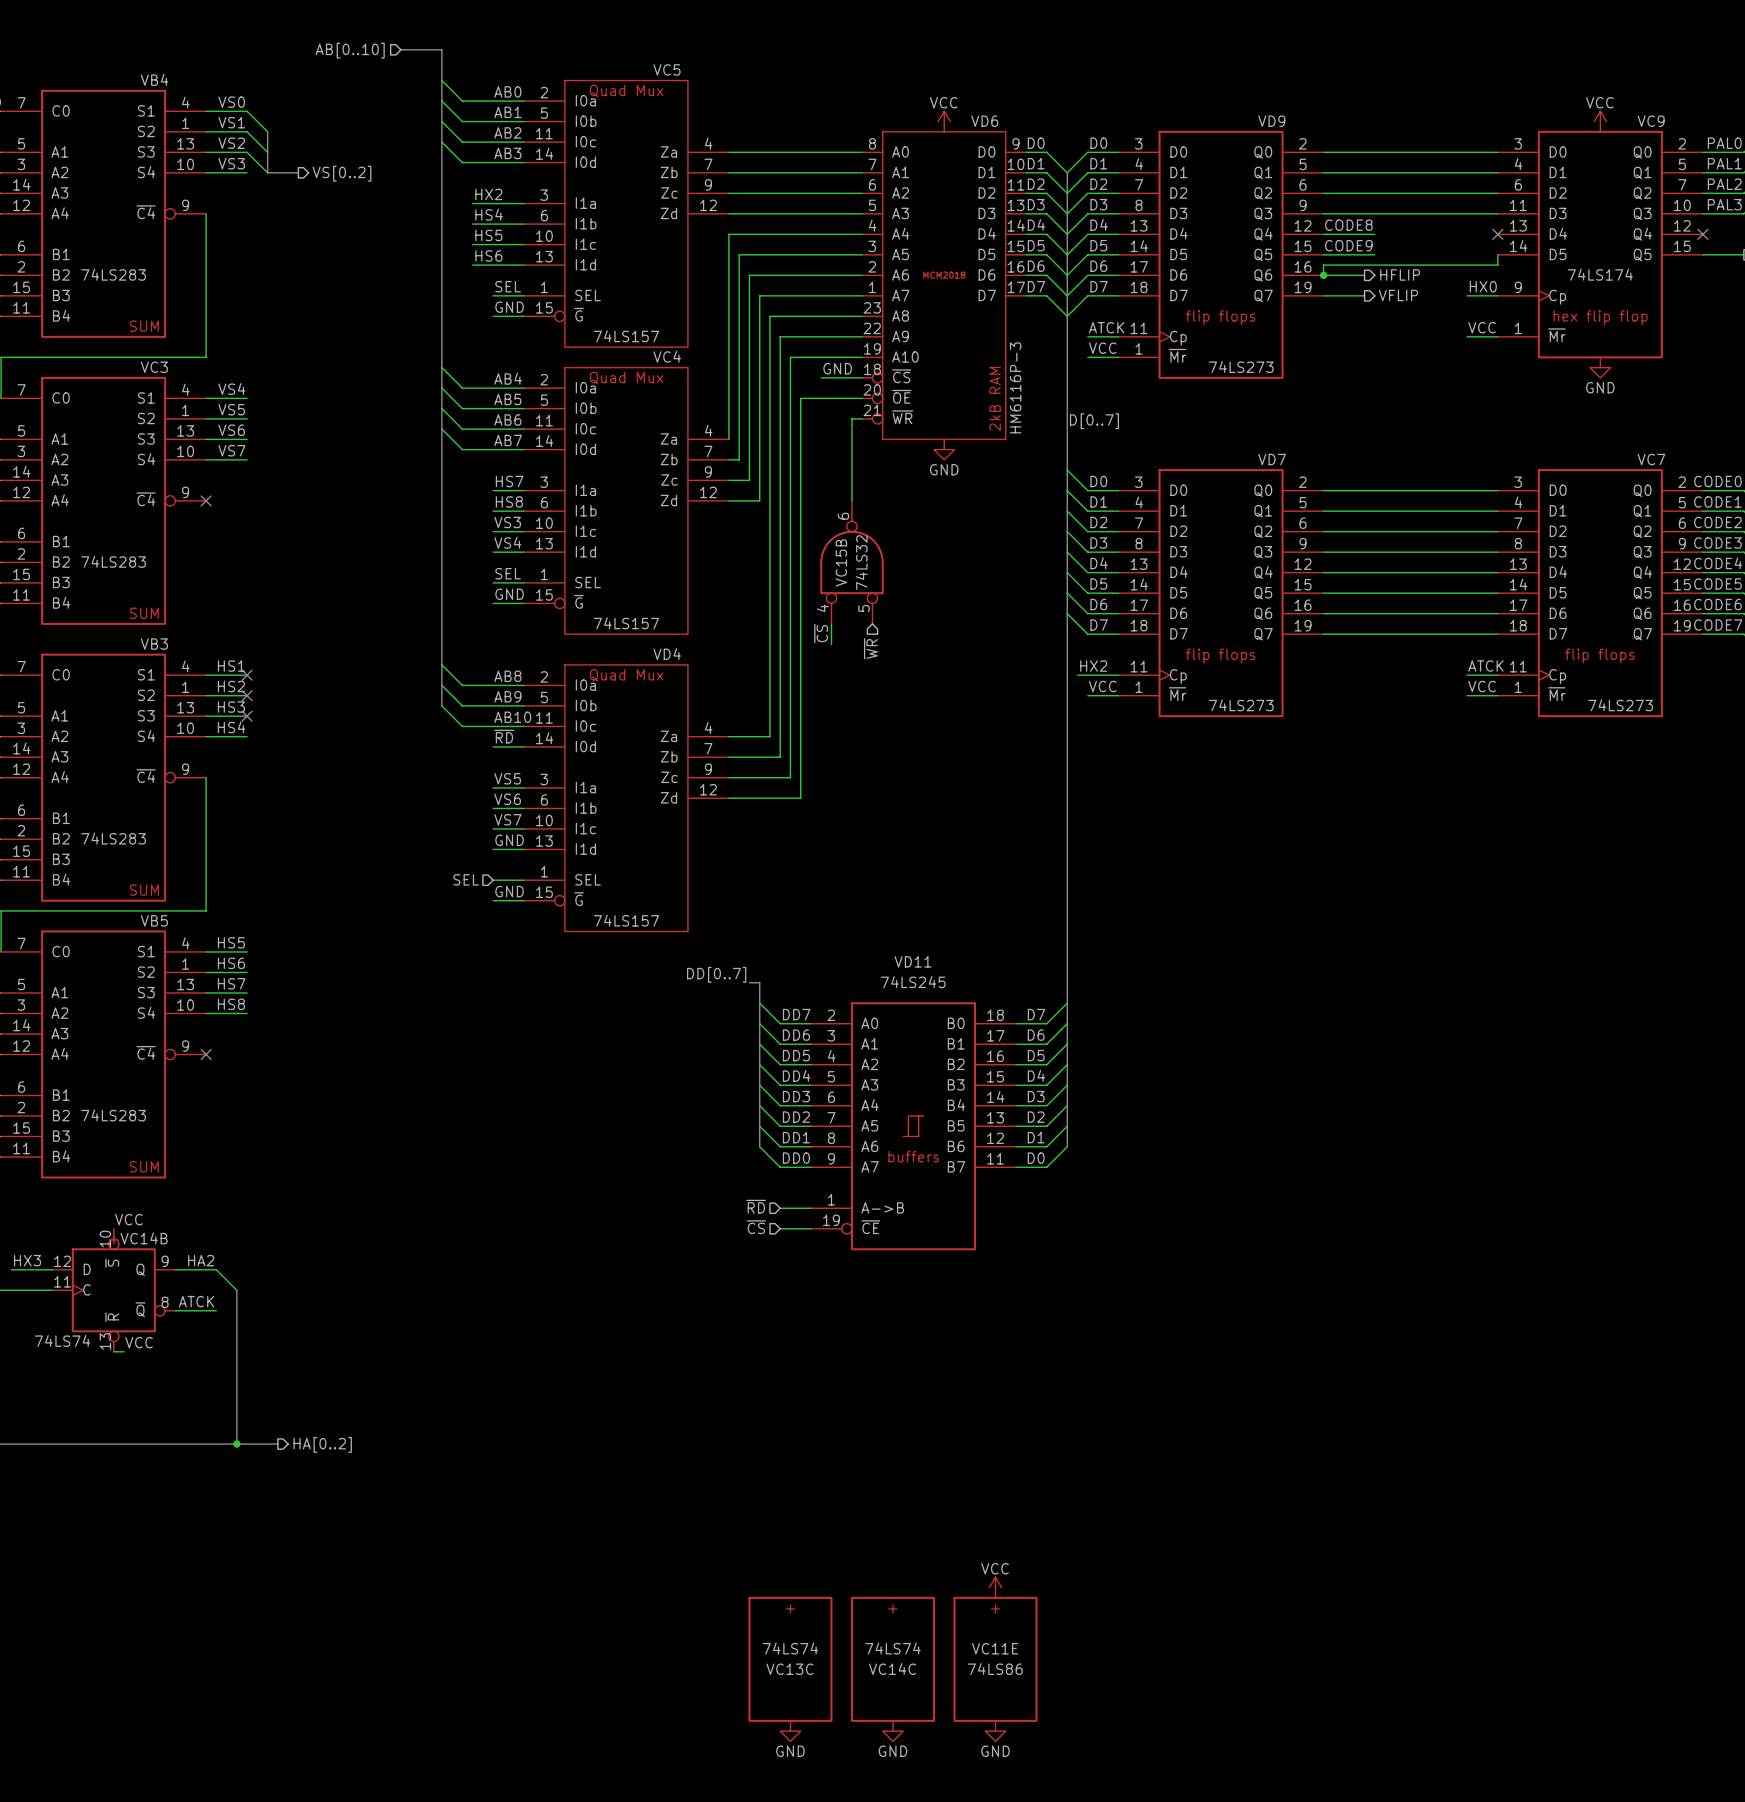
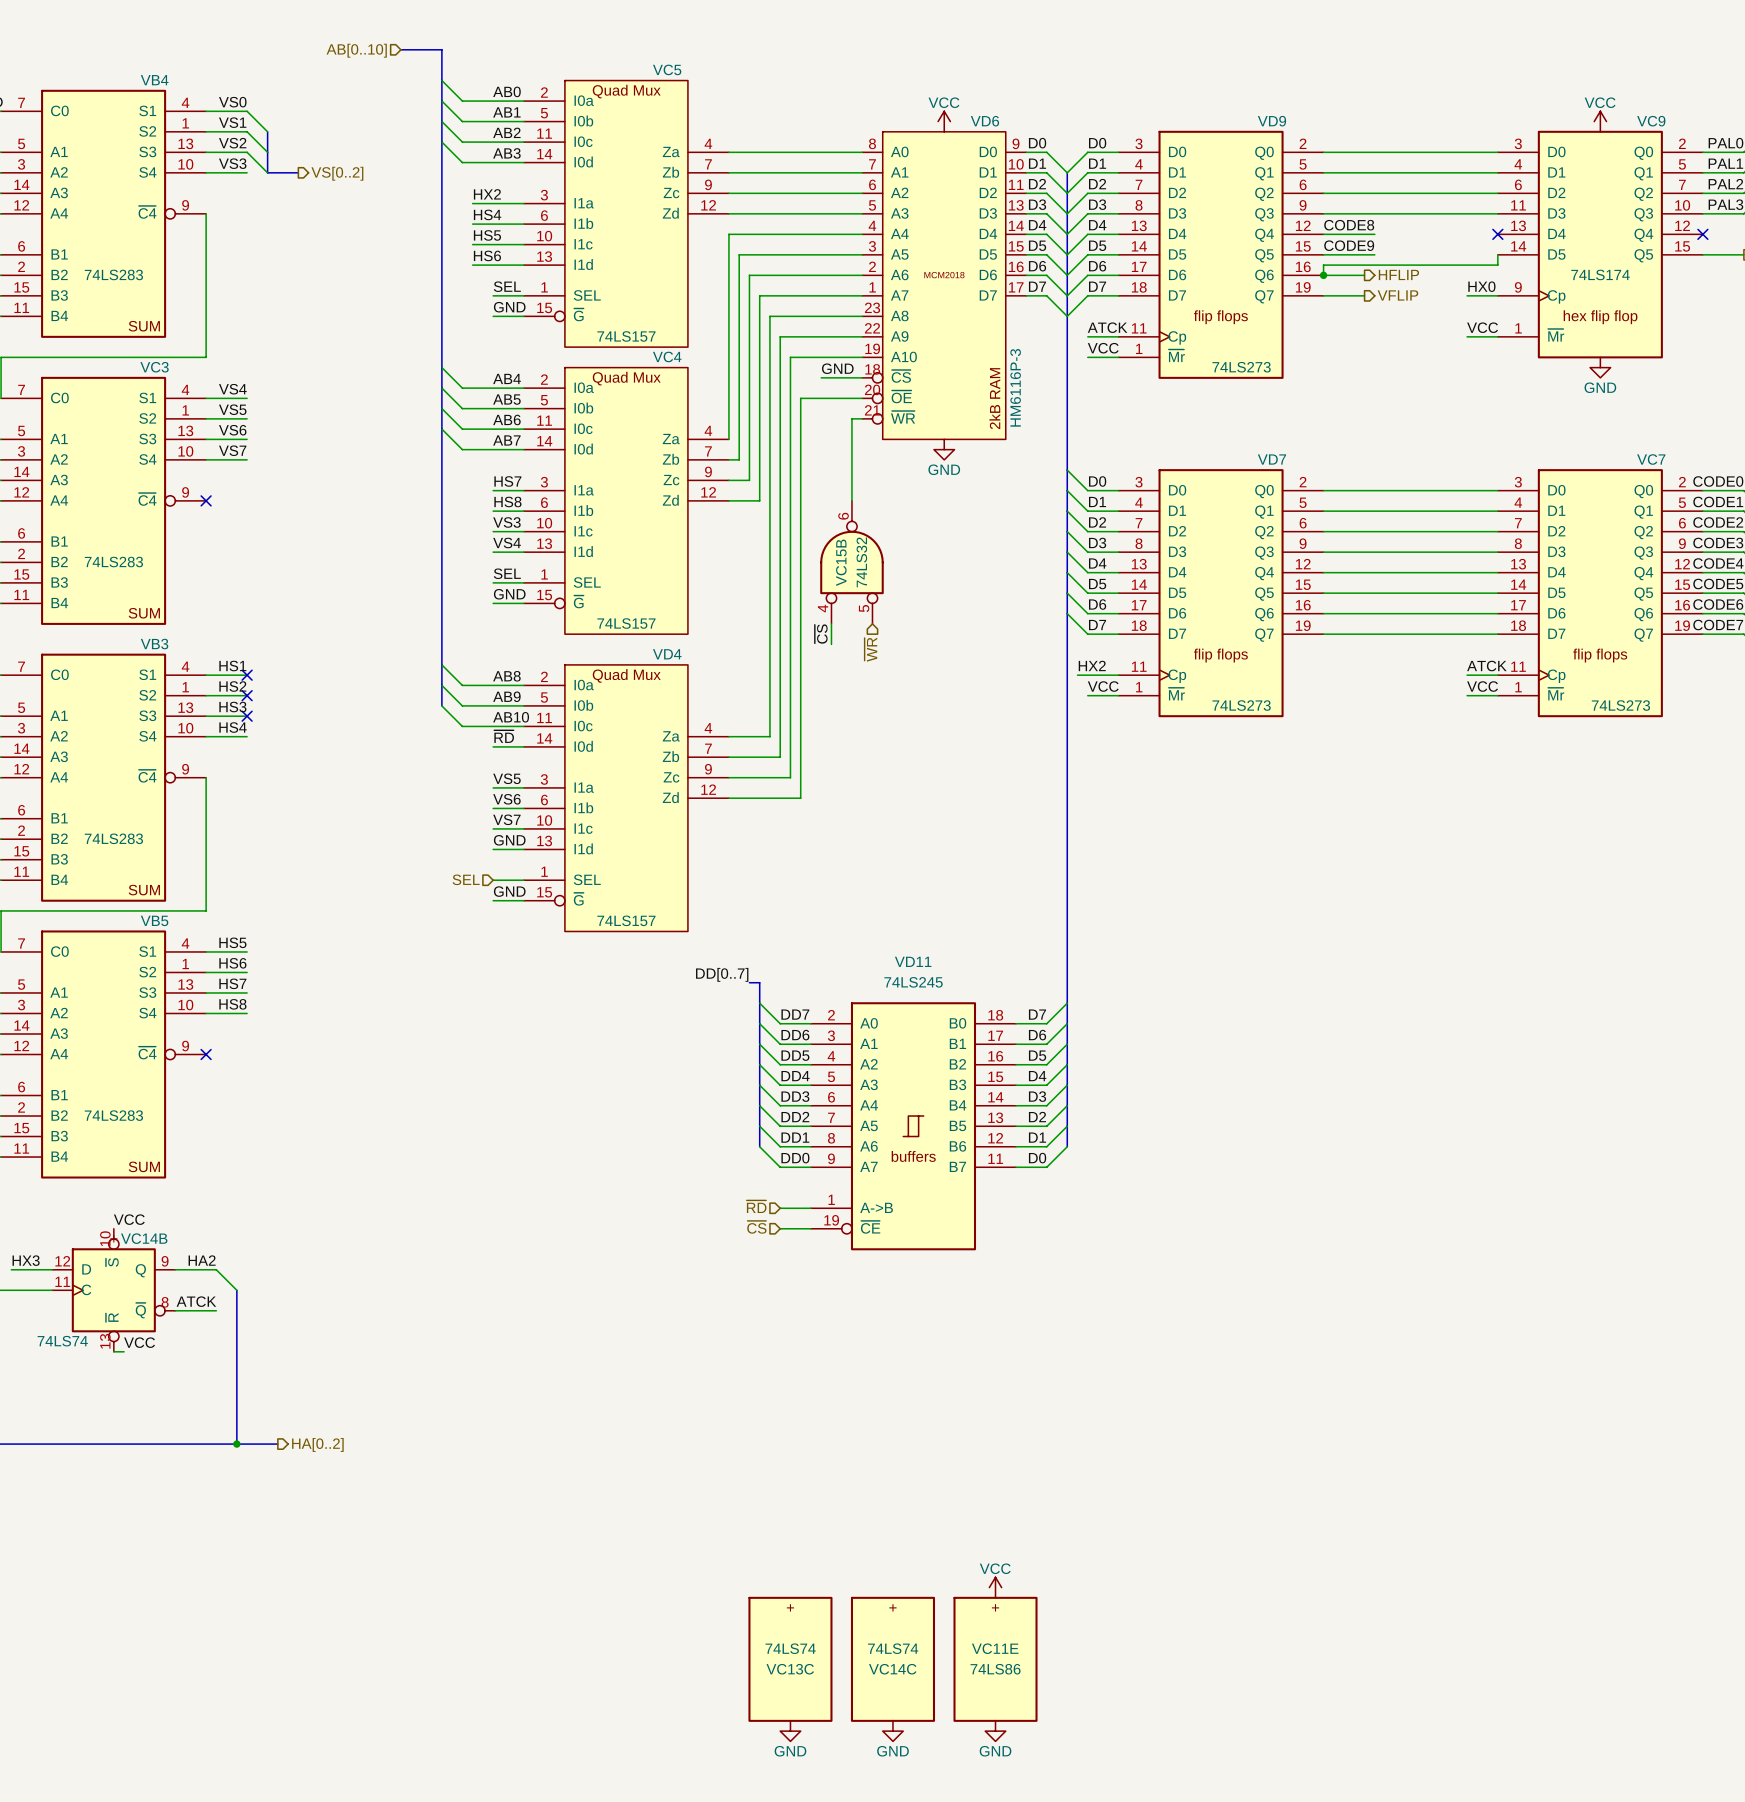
label: D[0..7] (1094, 421) -> none

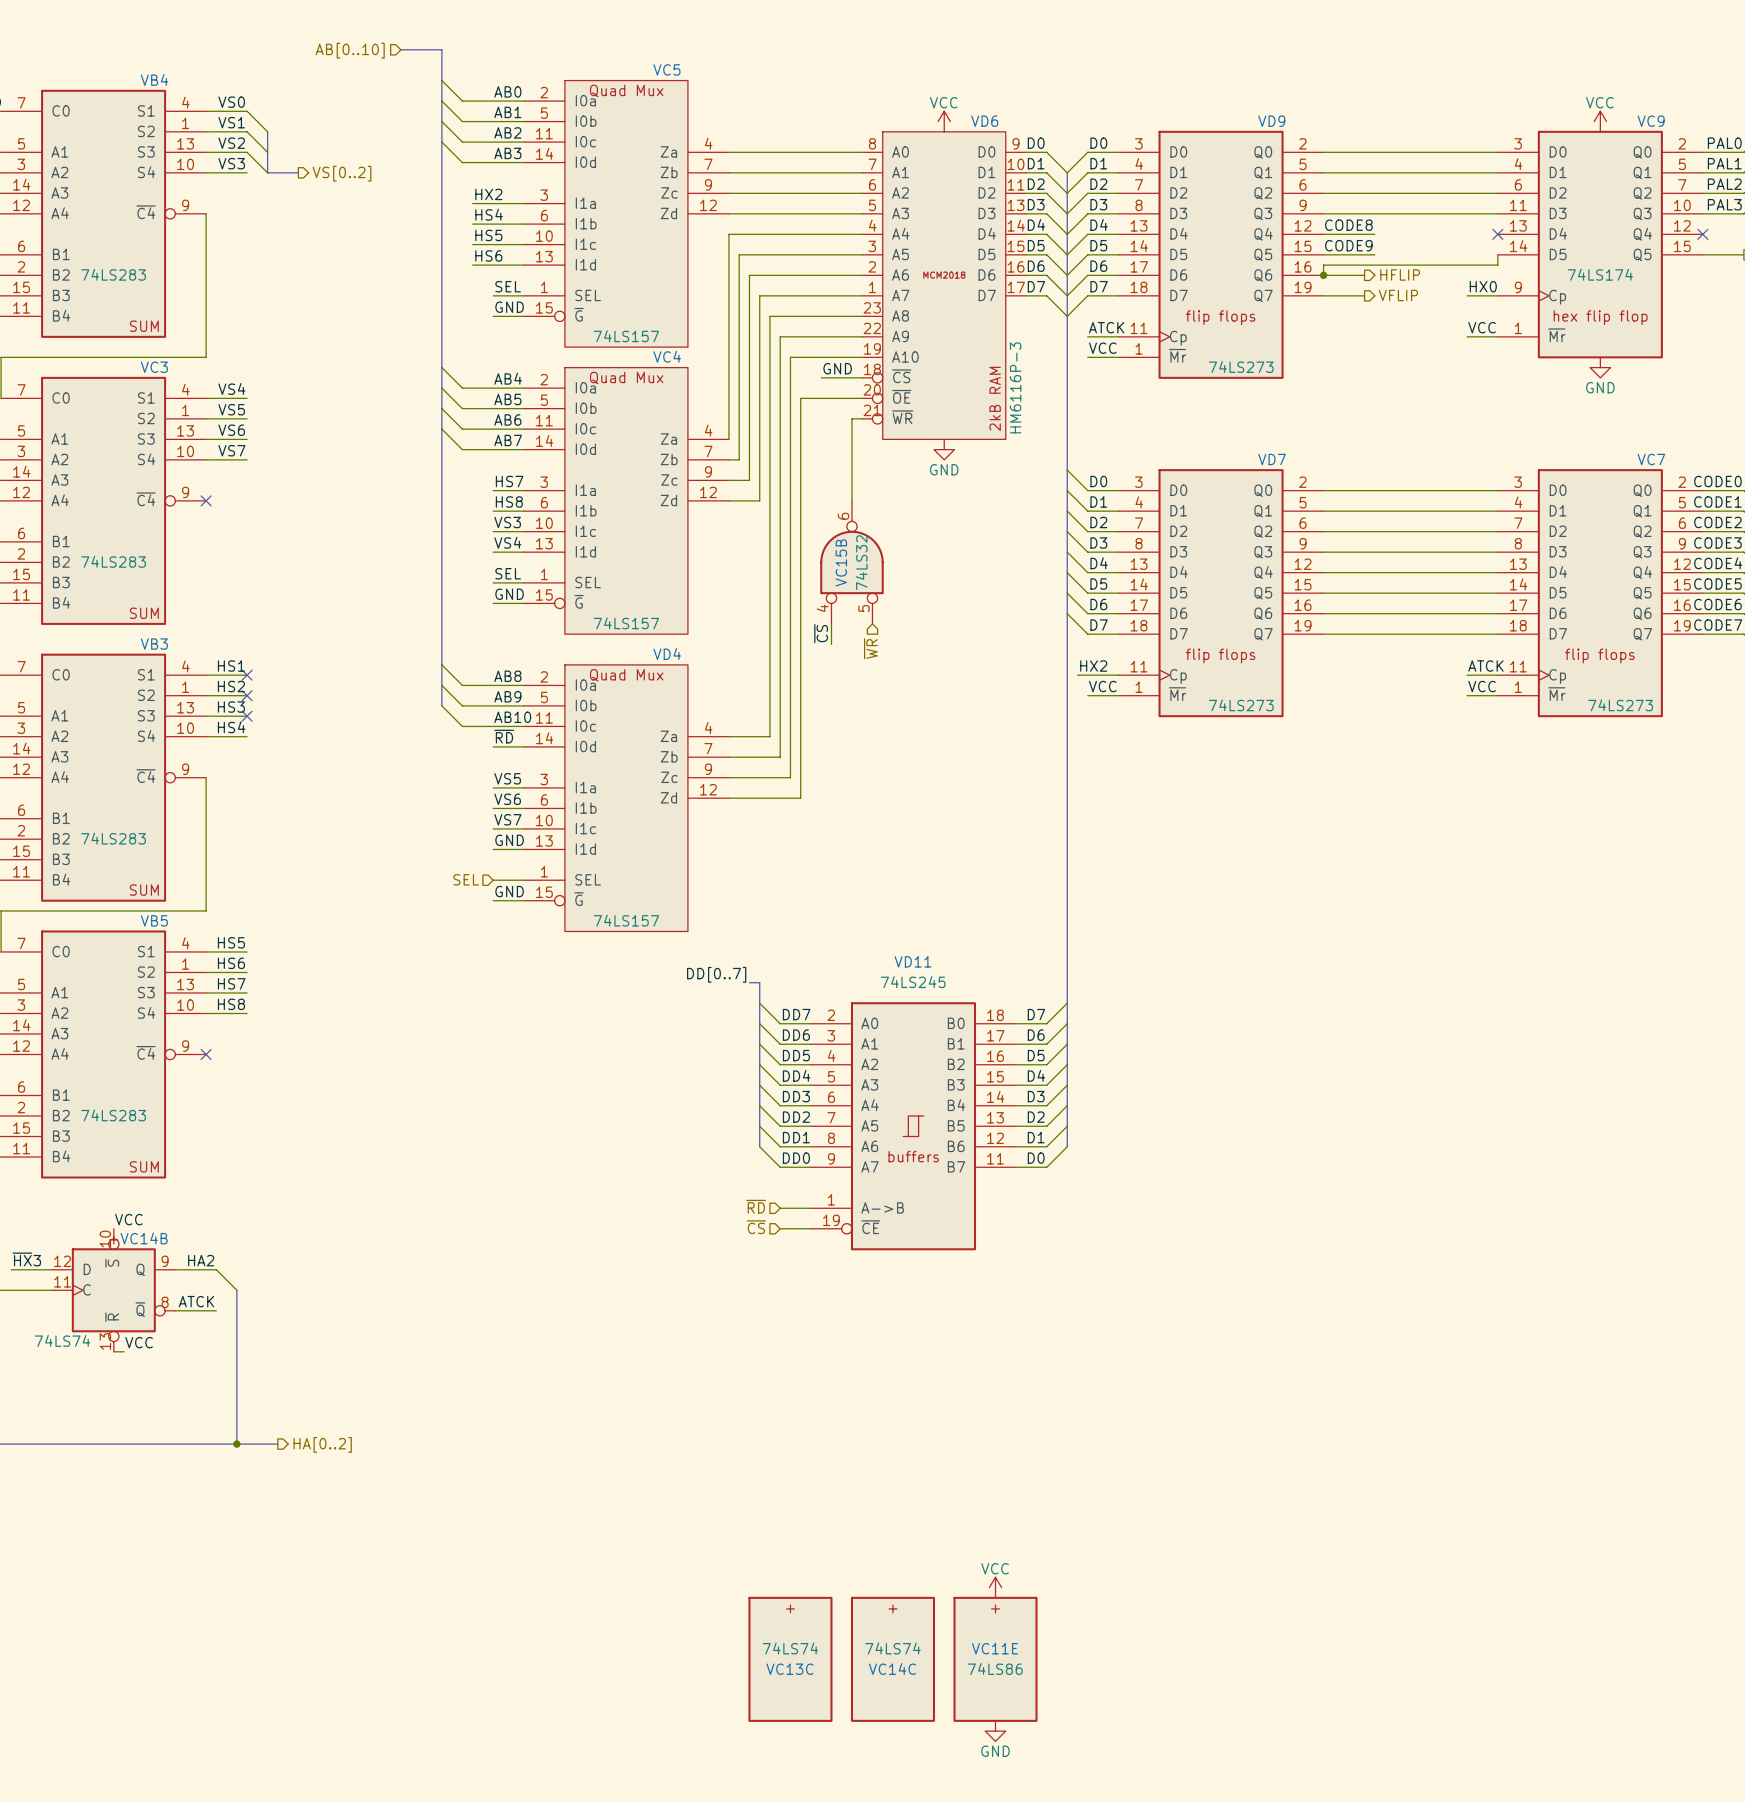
label: HX3 (26, 1260) -> ~{HX}3 (26, 1259)
power symbol: GND (790, 1731) -> none
power symbol: GND (892, 1731) -> none

